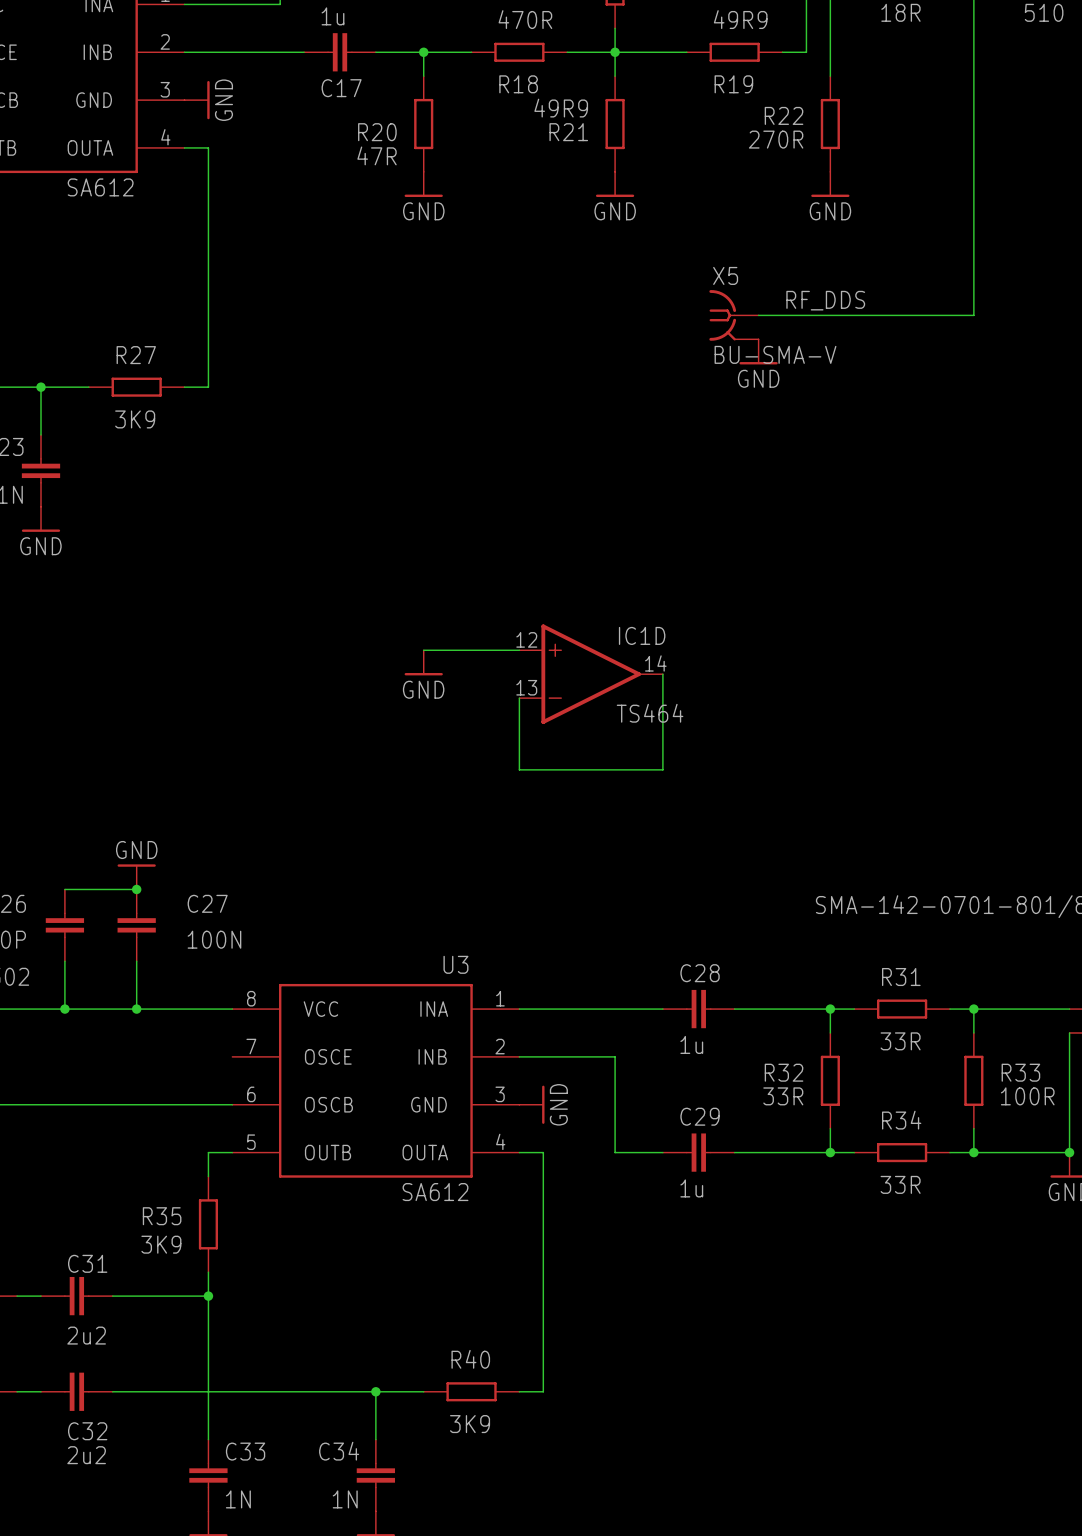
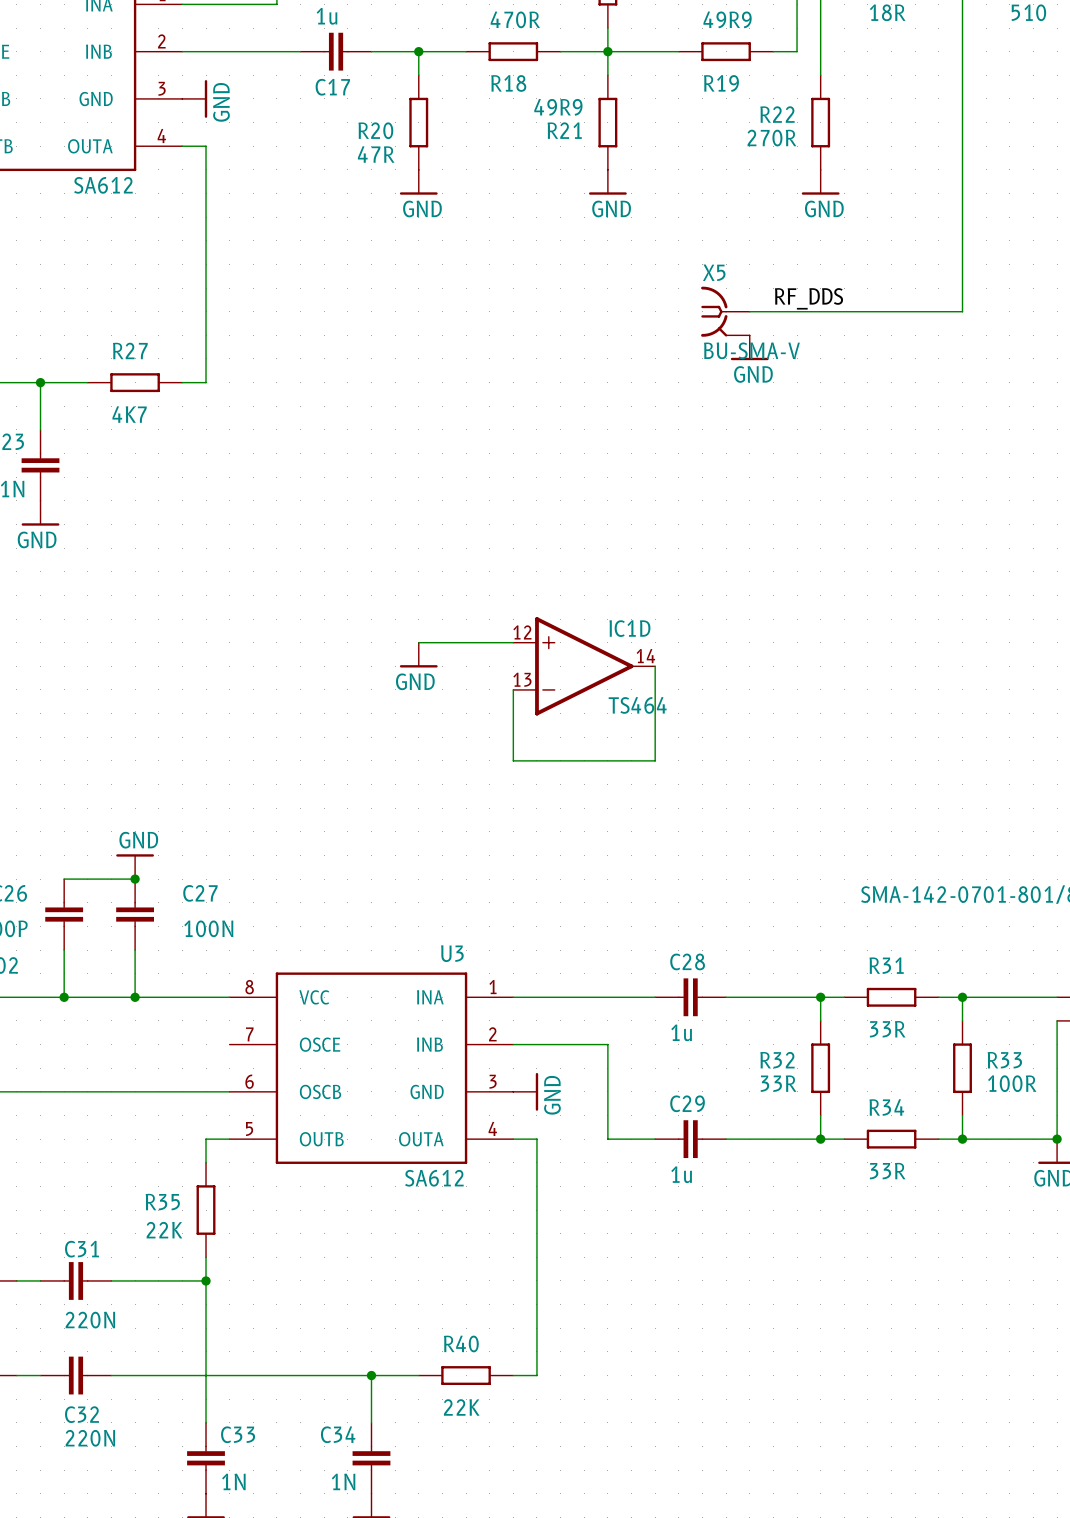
R27 value: 3K9 (135, 419) -> 4K7 (129, 414)
R35 value: 3K9 (161, 1244) -> 22K (164, 1230)
C31 value: 2u2 (86, 1335) -> 220N (90, 1320)
R40 value: 3K9 (470, 1424) -> 22K (461, 1407)
C32 value: 2u2 (86, 1455) -> 220N (90, 1438)

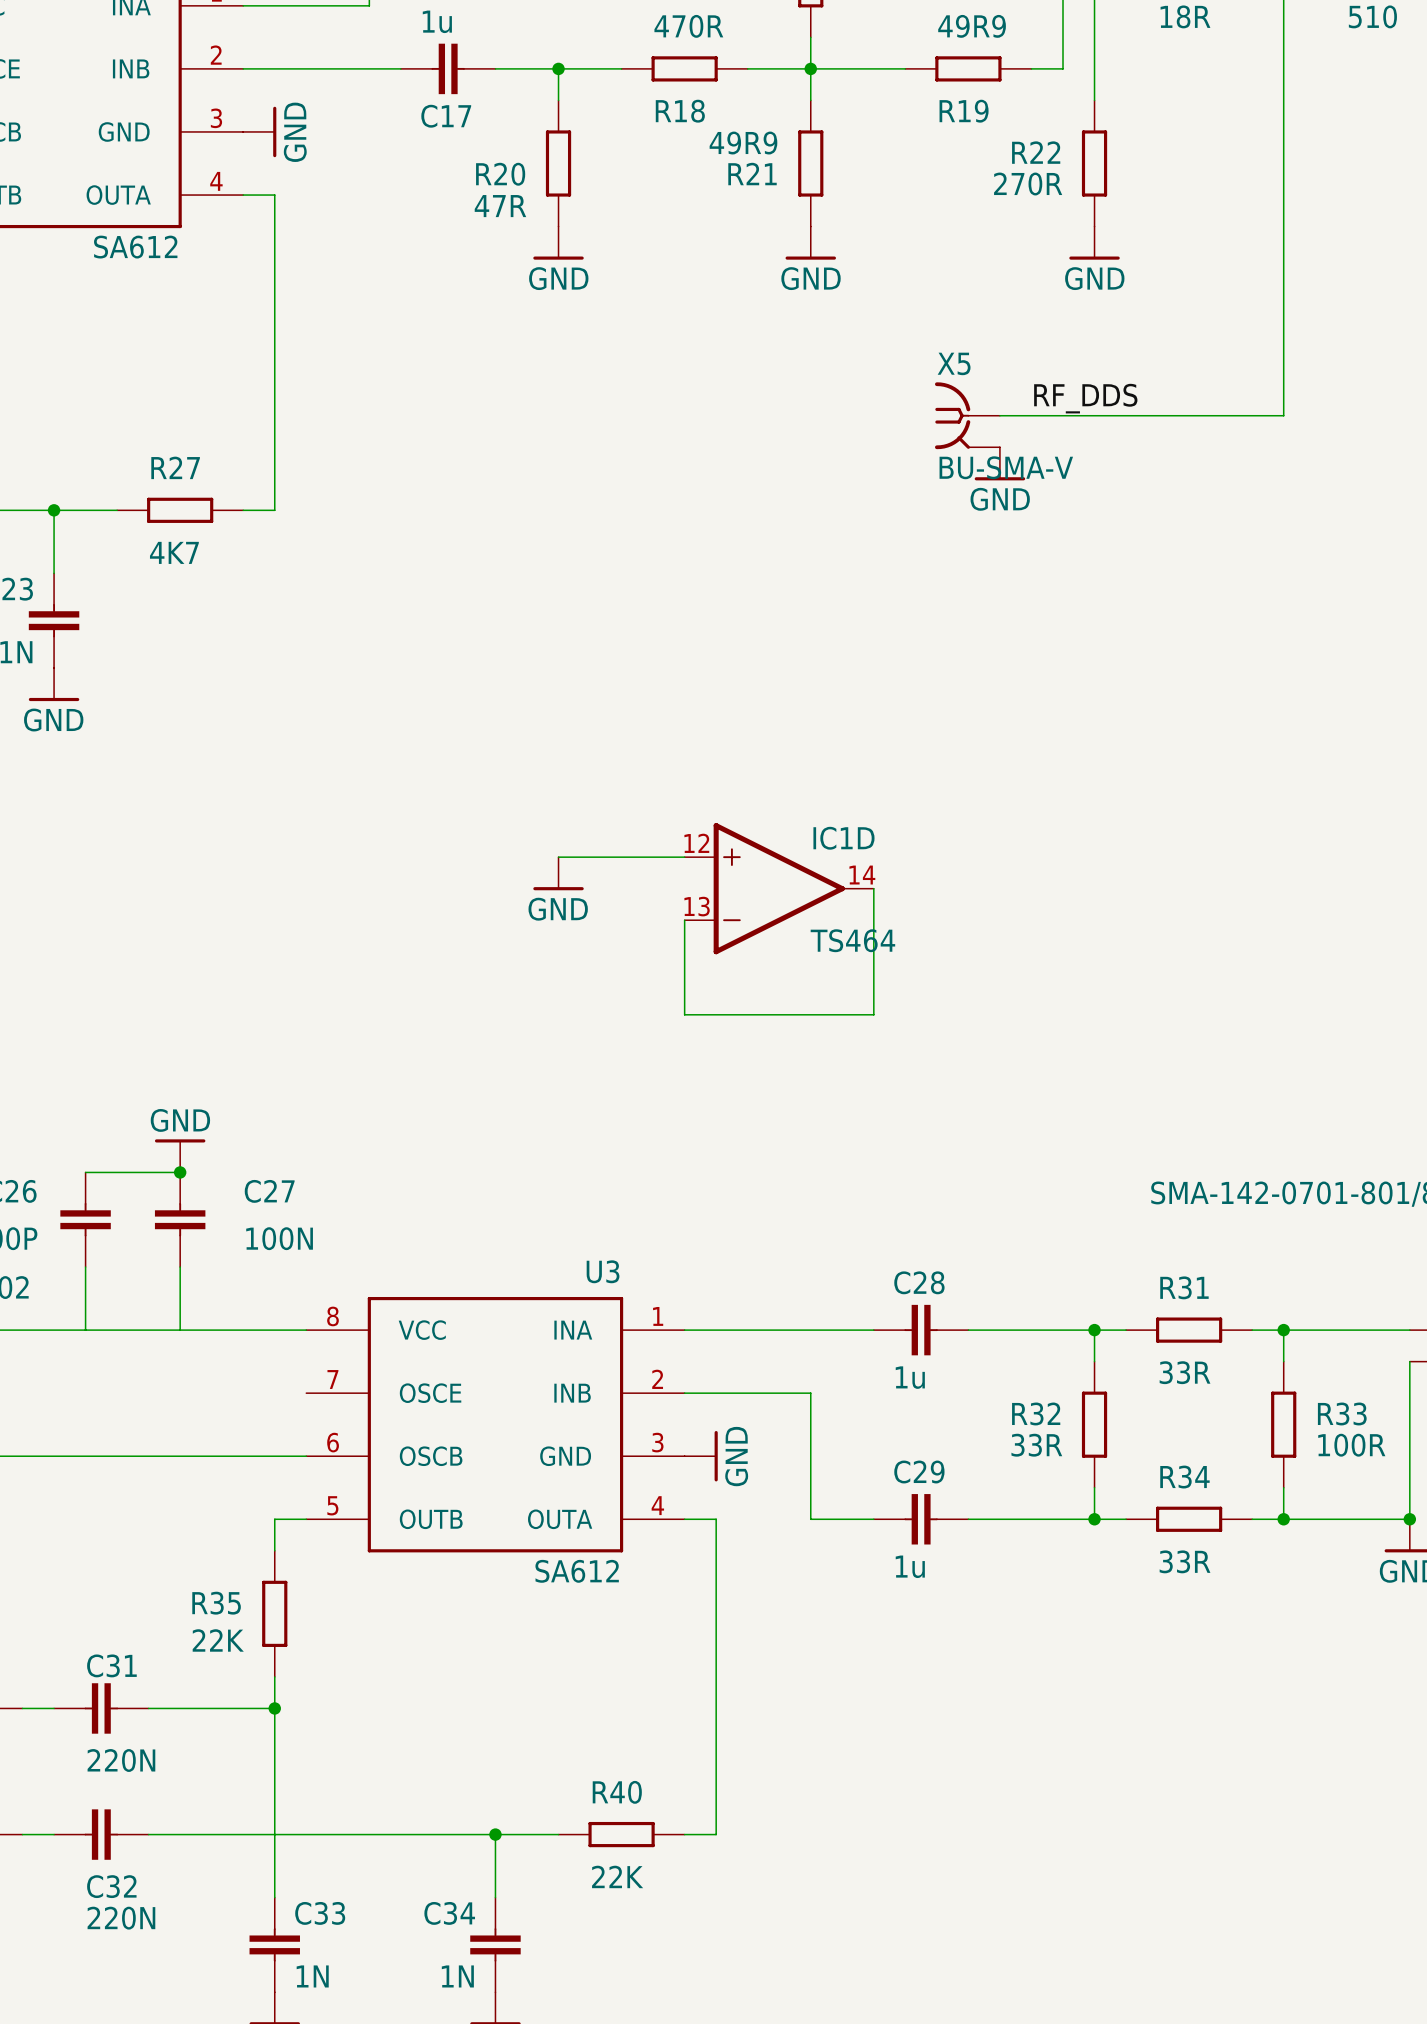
junction: (64, 997) -> none
junction: (135, 997) -> none

